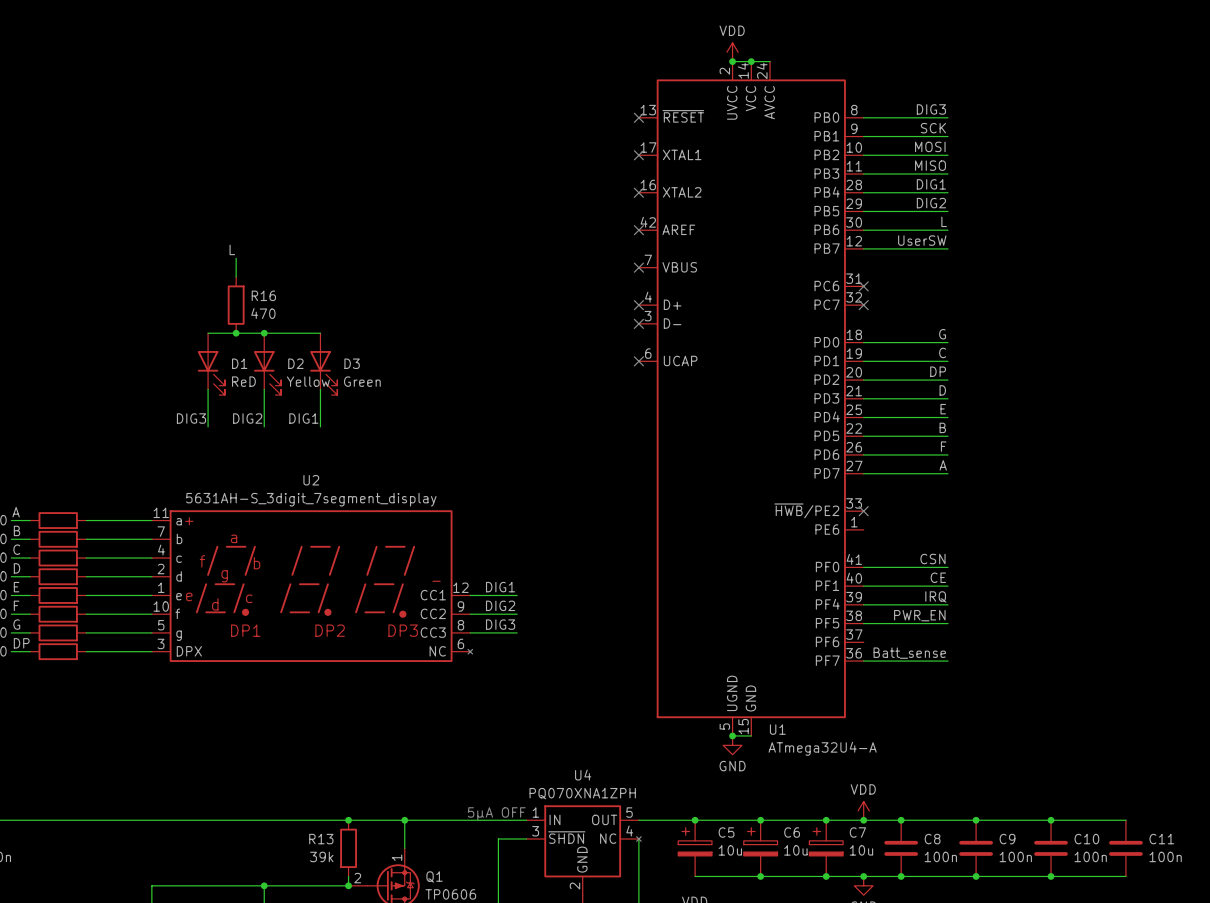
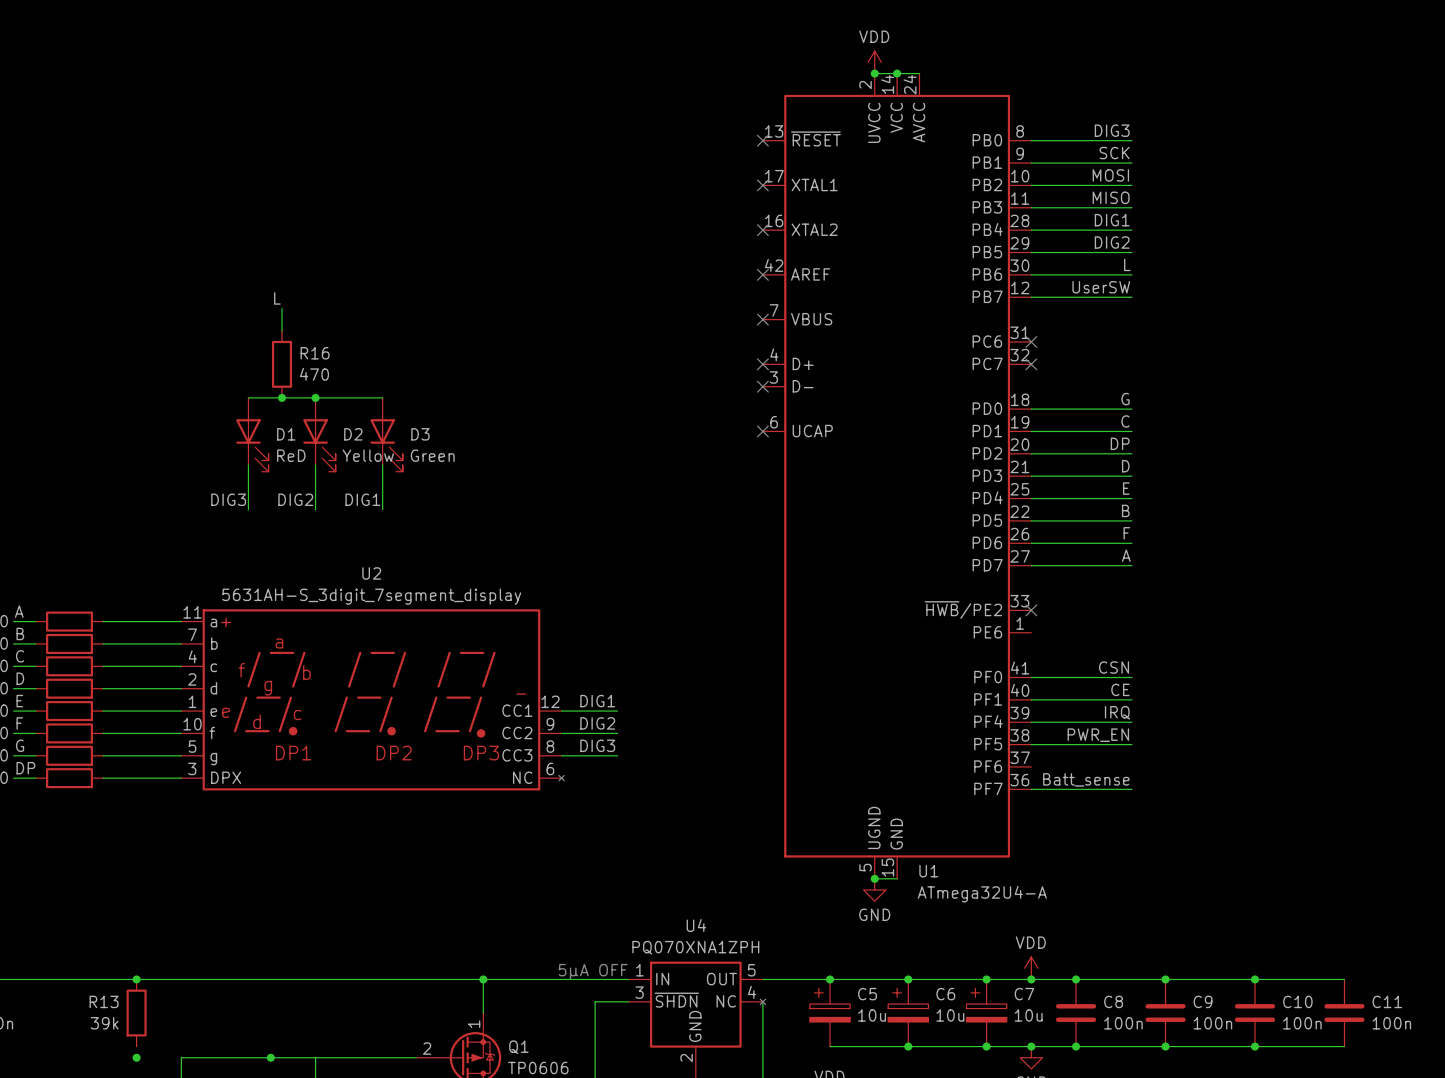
junction: none -> (136, 979)
junction: (348, 820) -> none
R13 position: (348, 848) -> (136, 1013)
wire: (348, 876) (348, 885) -> none
junction: none -> (136, 1057)
junction position: (264, 885) -> (270, 1057)
junction: (348, 885) -> none

